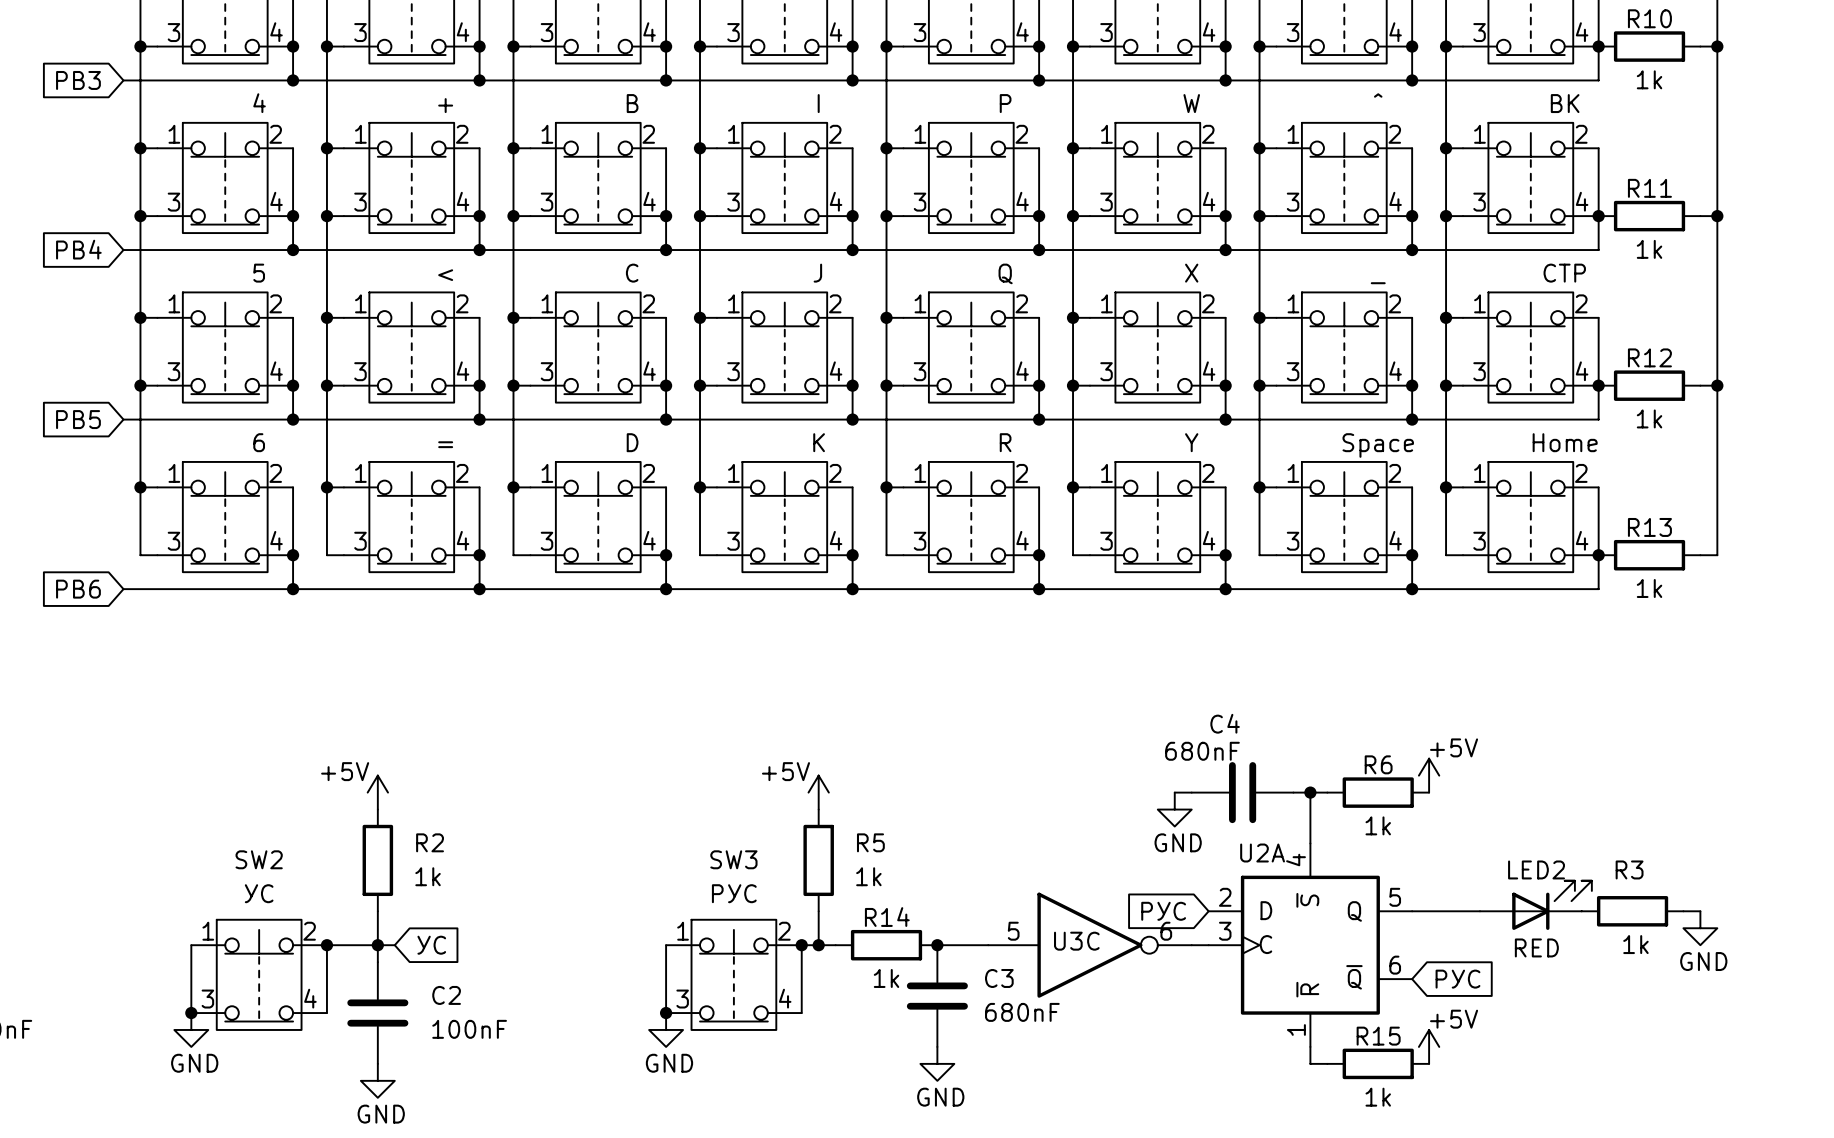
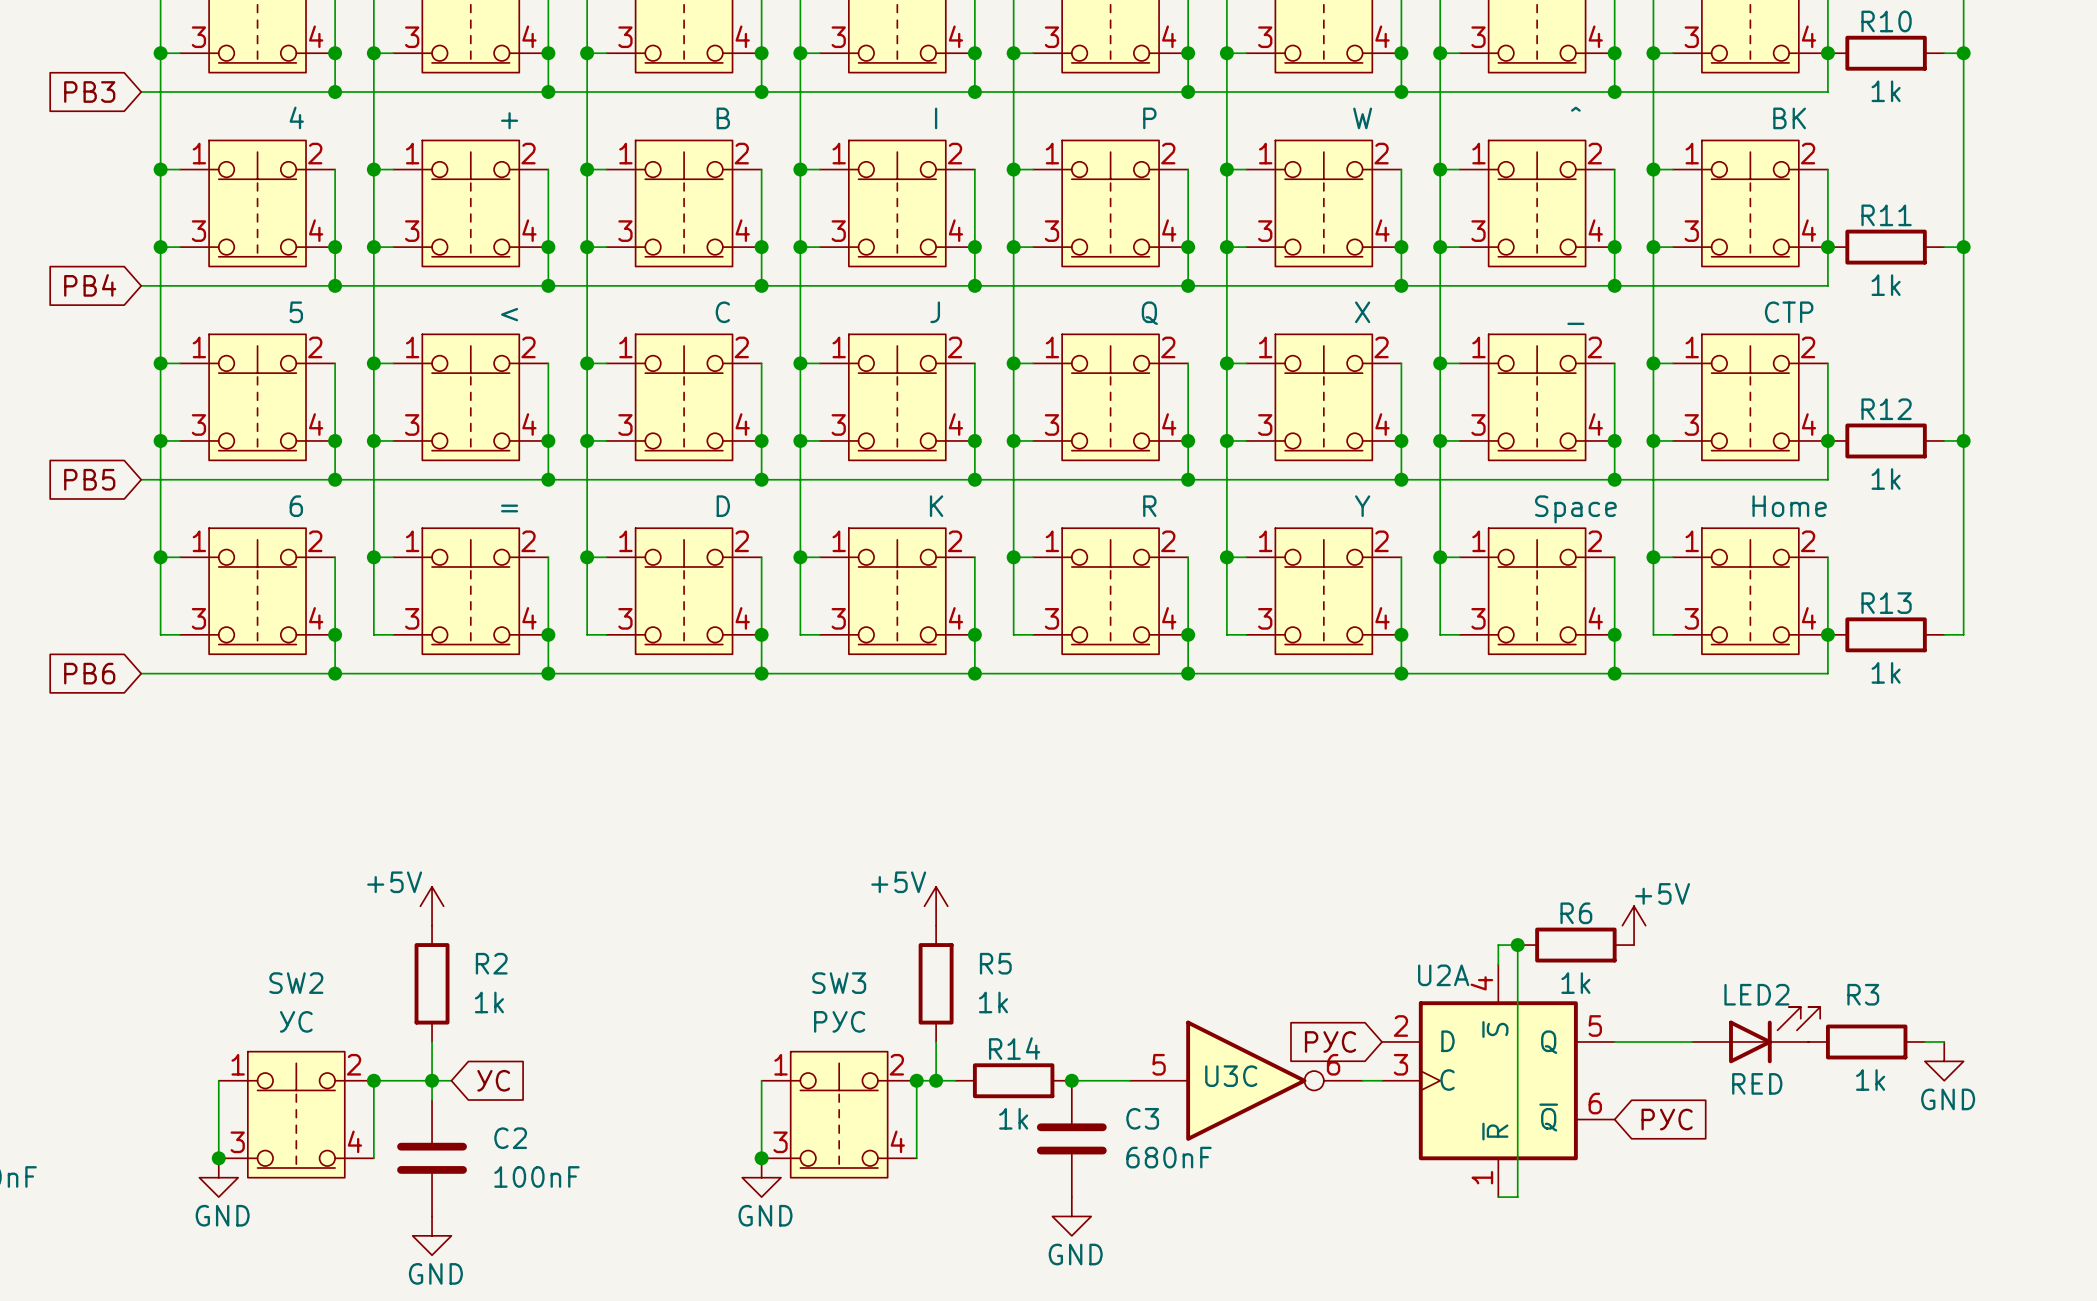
power symbol position: +5V (1429, 775) -> +5V (1634, 925)
wire: (1174, 792) (1191, 792) -> none
C4: 680nF (1242, 792) -> none
wire: (1293, 792) (1327, 792) -> none
wire: (1310, 792) (1310, 826) -> none
junction position: (1310, 792) -> (1517, 945)
R6 position: (1378, 792) -> (1575, 945)
power symbol: GND (1174, 809) -> none
wire: (1310, 1046) (1310, 1063) (1327, 1063) -> (1498, 1197) (1517, 1197) (1517, 945) (1498, 945)
power symbol: +5V (1429, 1046) -> none
R15: 1k (1378, 1063) -> none

